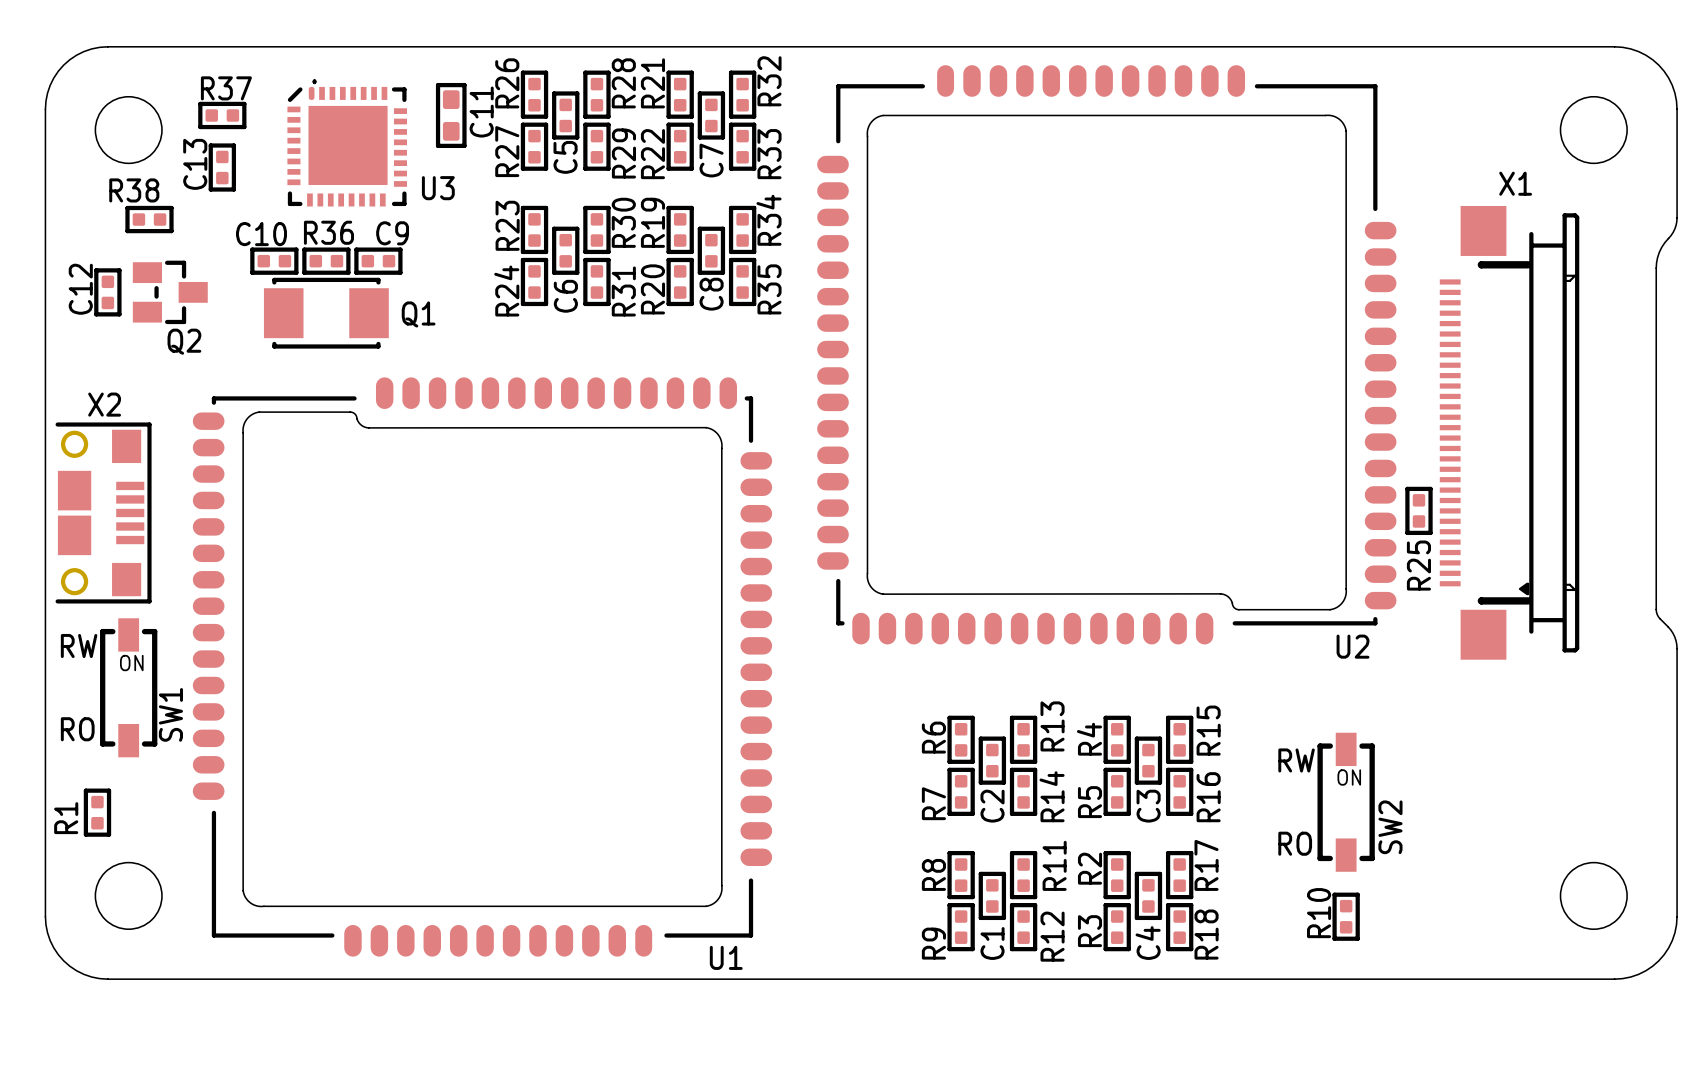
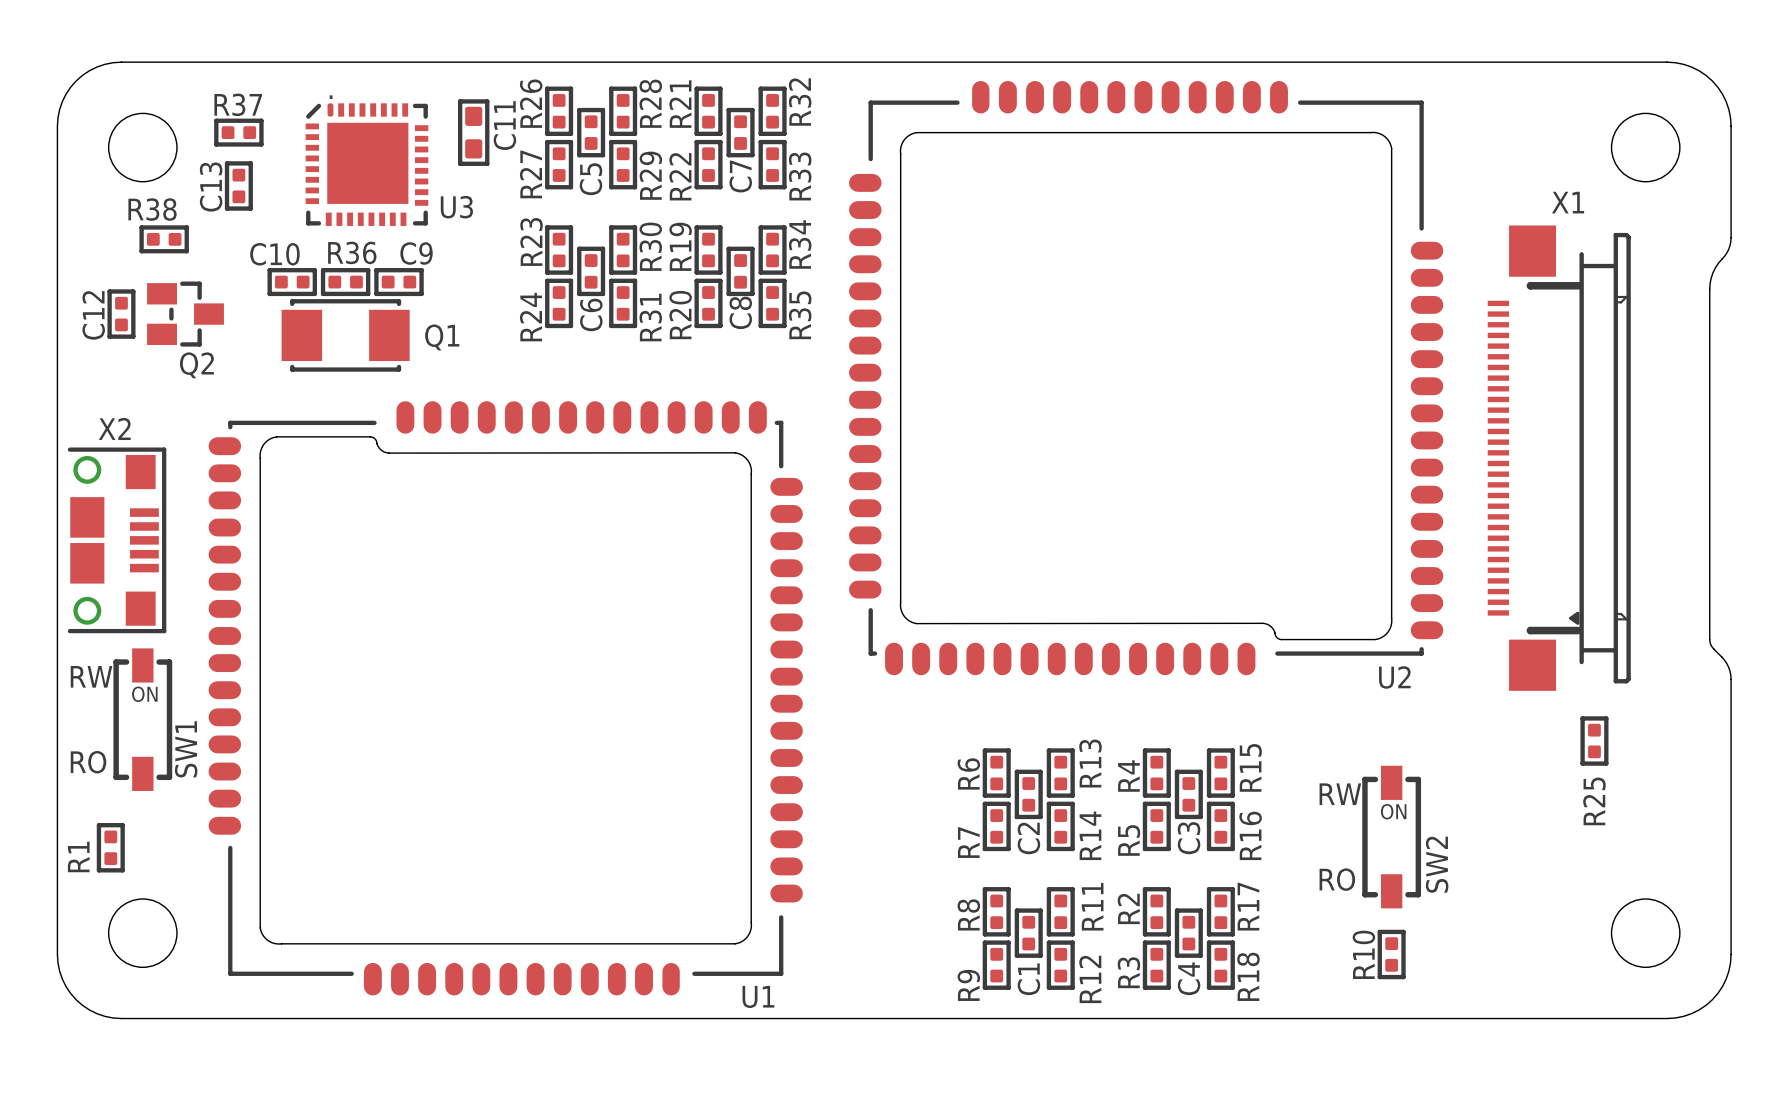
R25 position: (1418, 510) -> (1594, 741)

